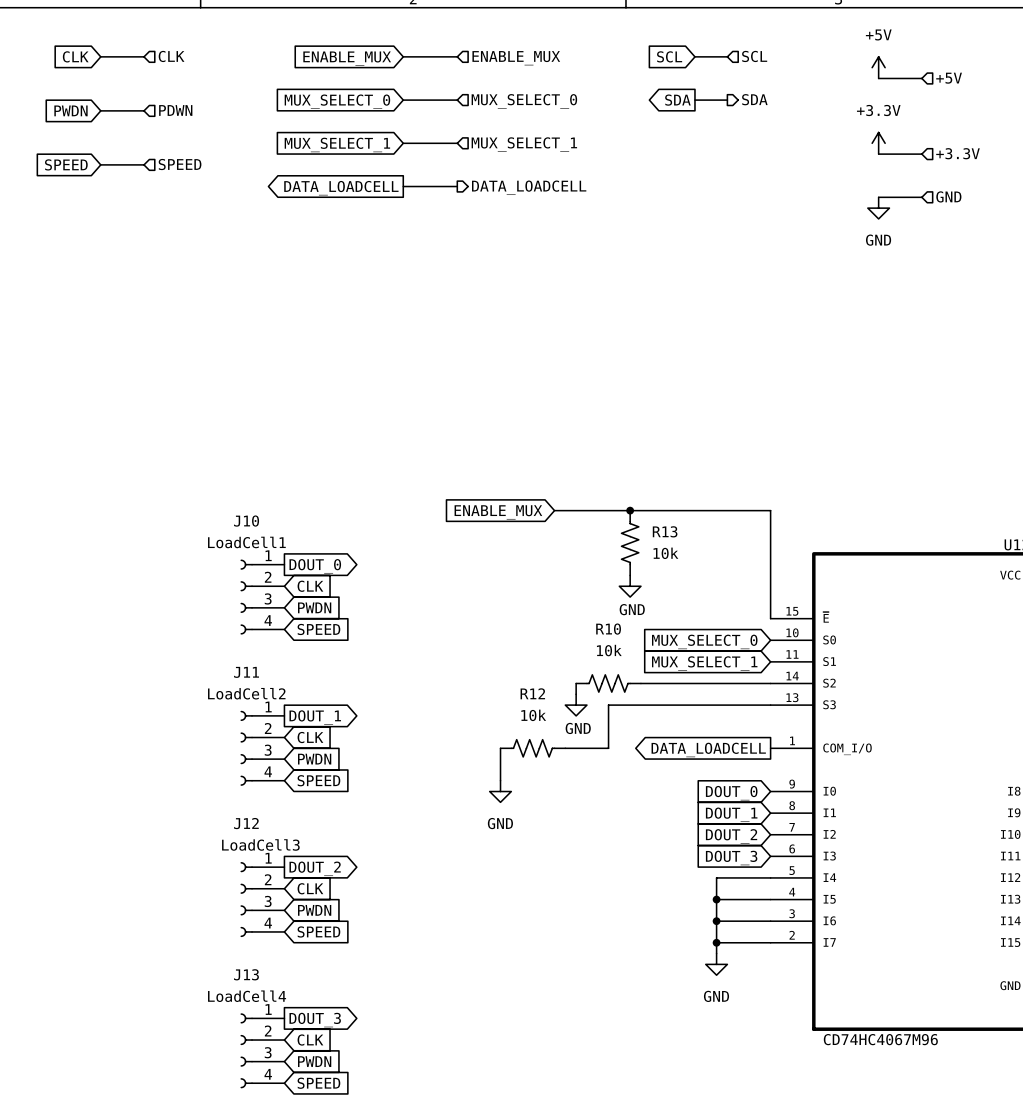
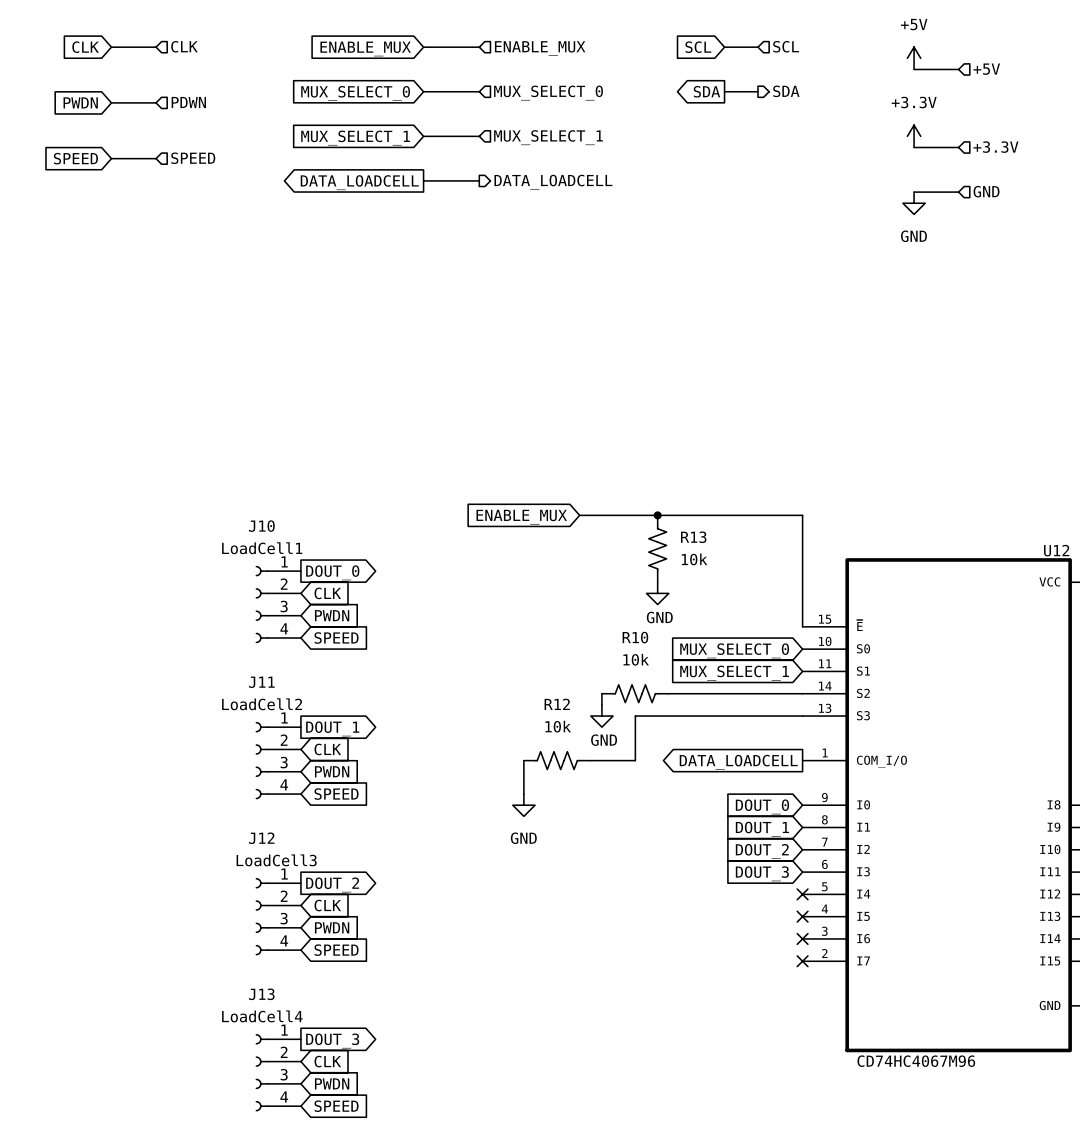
wire: (770, 877) (716, 877) (716, 953) -> none
no-connect mark: none -> (802, 894)
wire: (716, 899) (770, 899) -> none
junction: (716, 899) -> none
no-connect mark: none -> (802, 916)
wire: (716, 921) (770, 921) -> none
junction: (716, 921) -> none
no-connect mark: none -> (802, 938)
wire: (716, 942) (770, 942) -> none
junction: (716, 942) -> none
no-connect mark: none -> (802, 961)
power symbol: GND (716, 964) -> none

